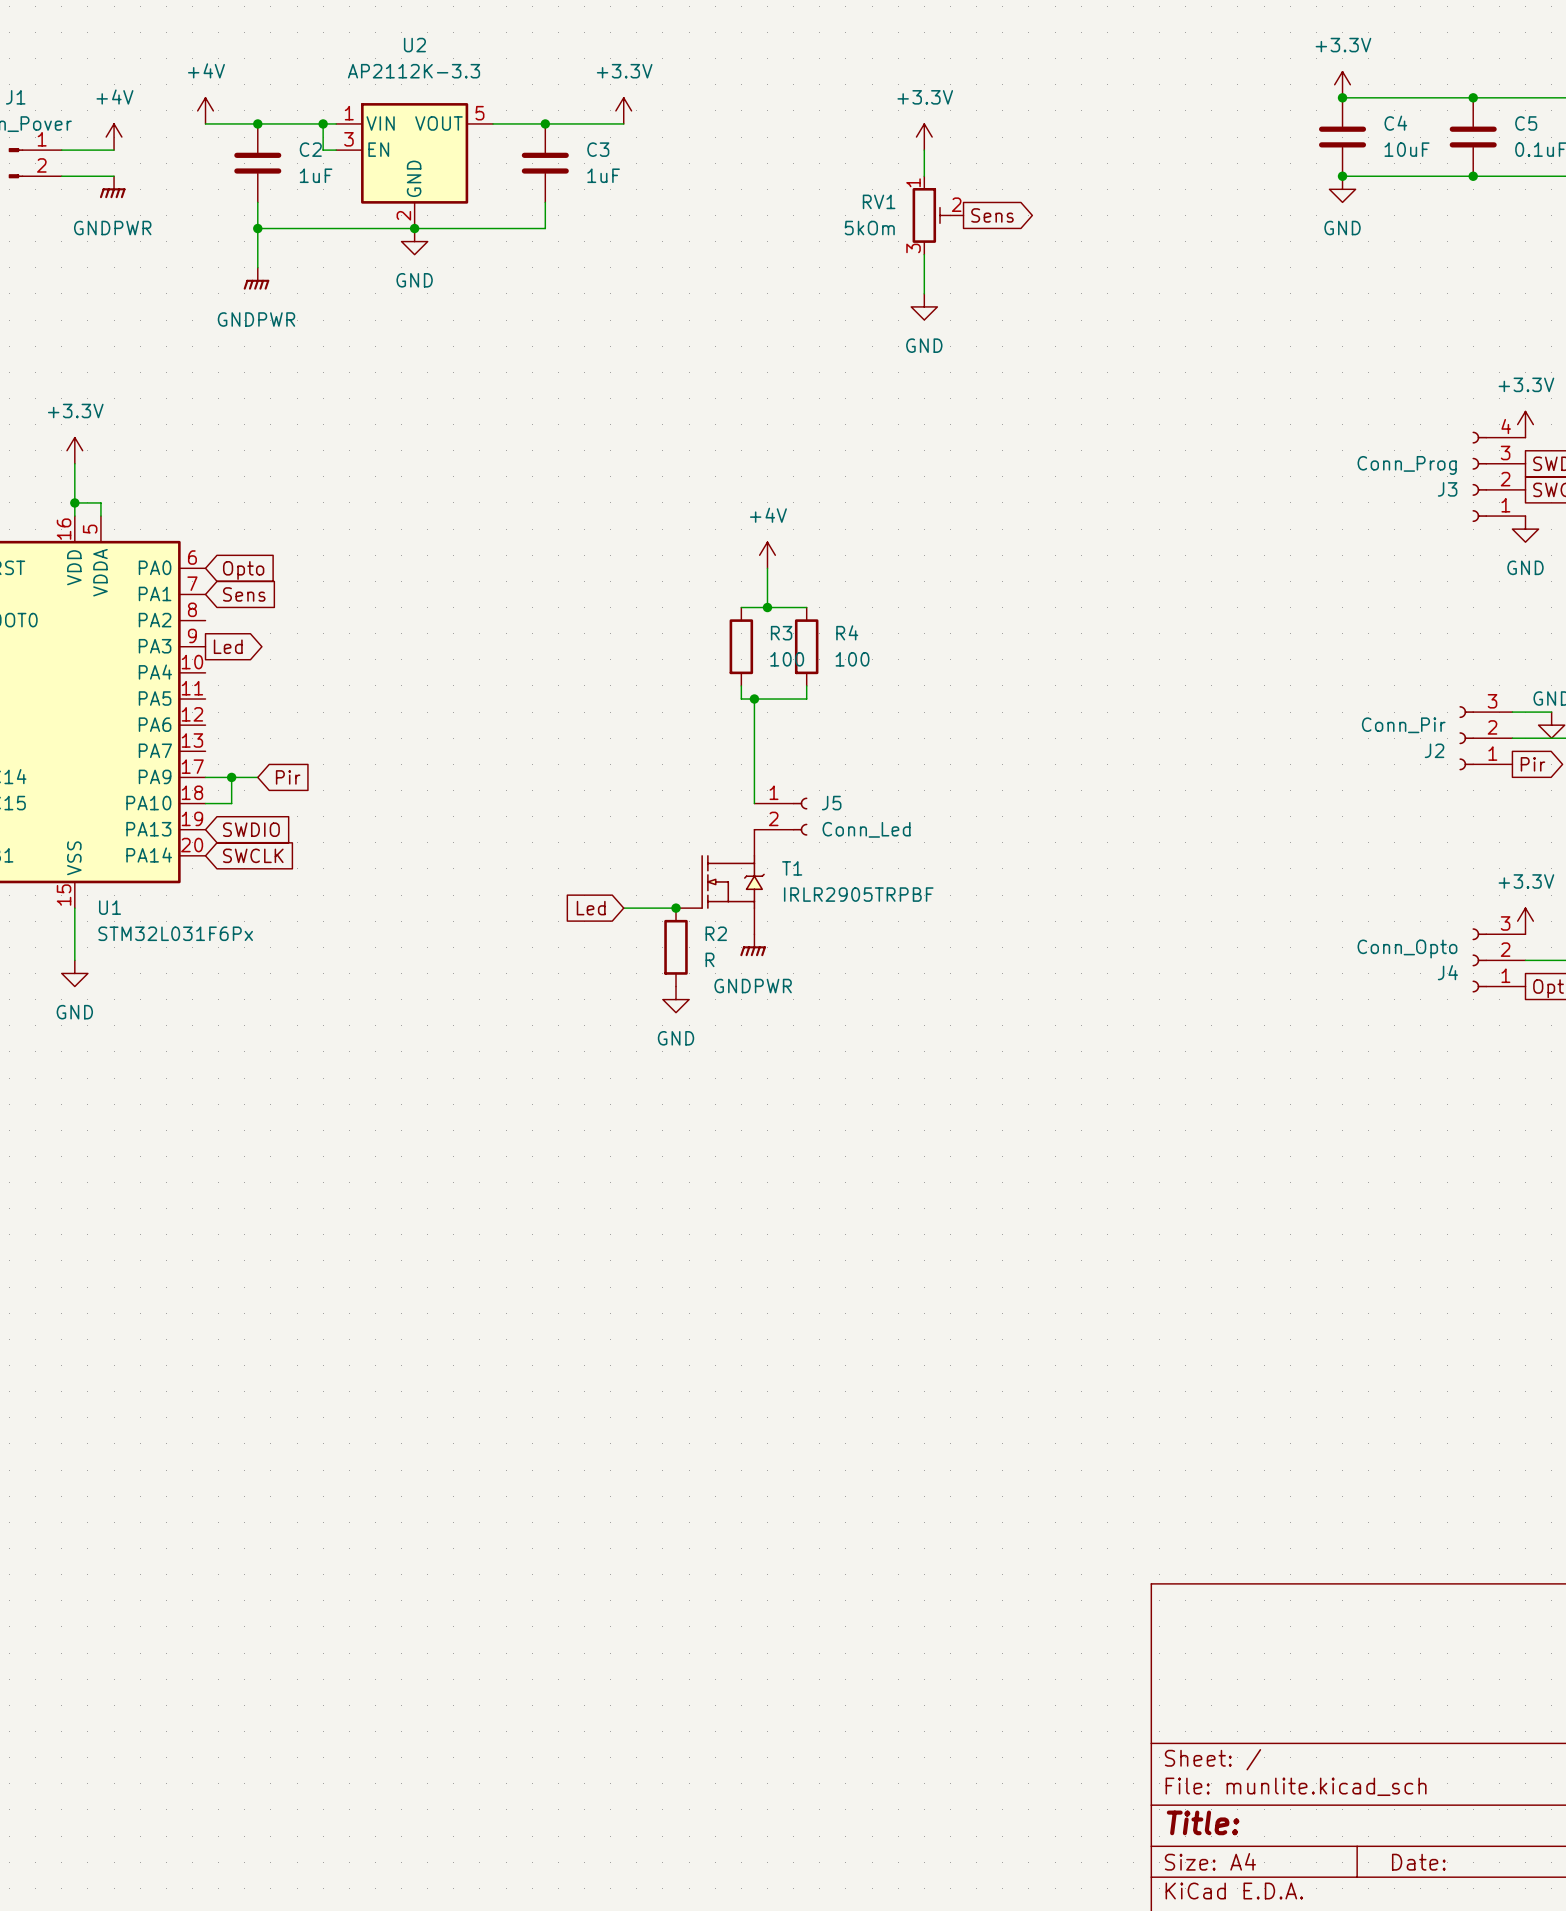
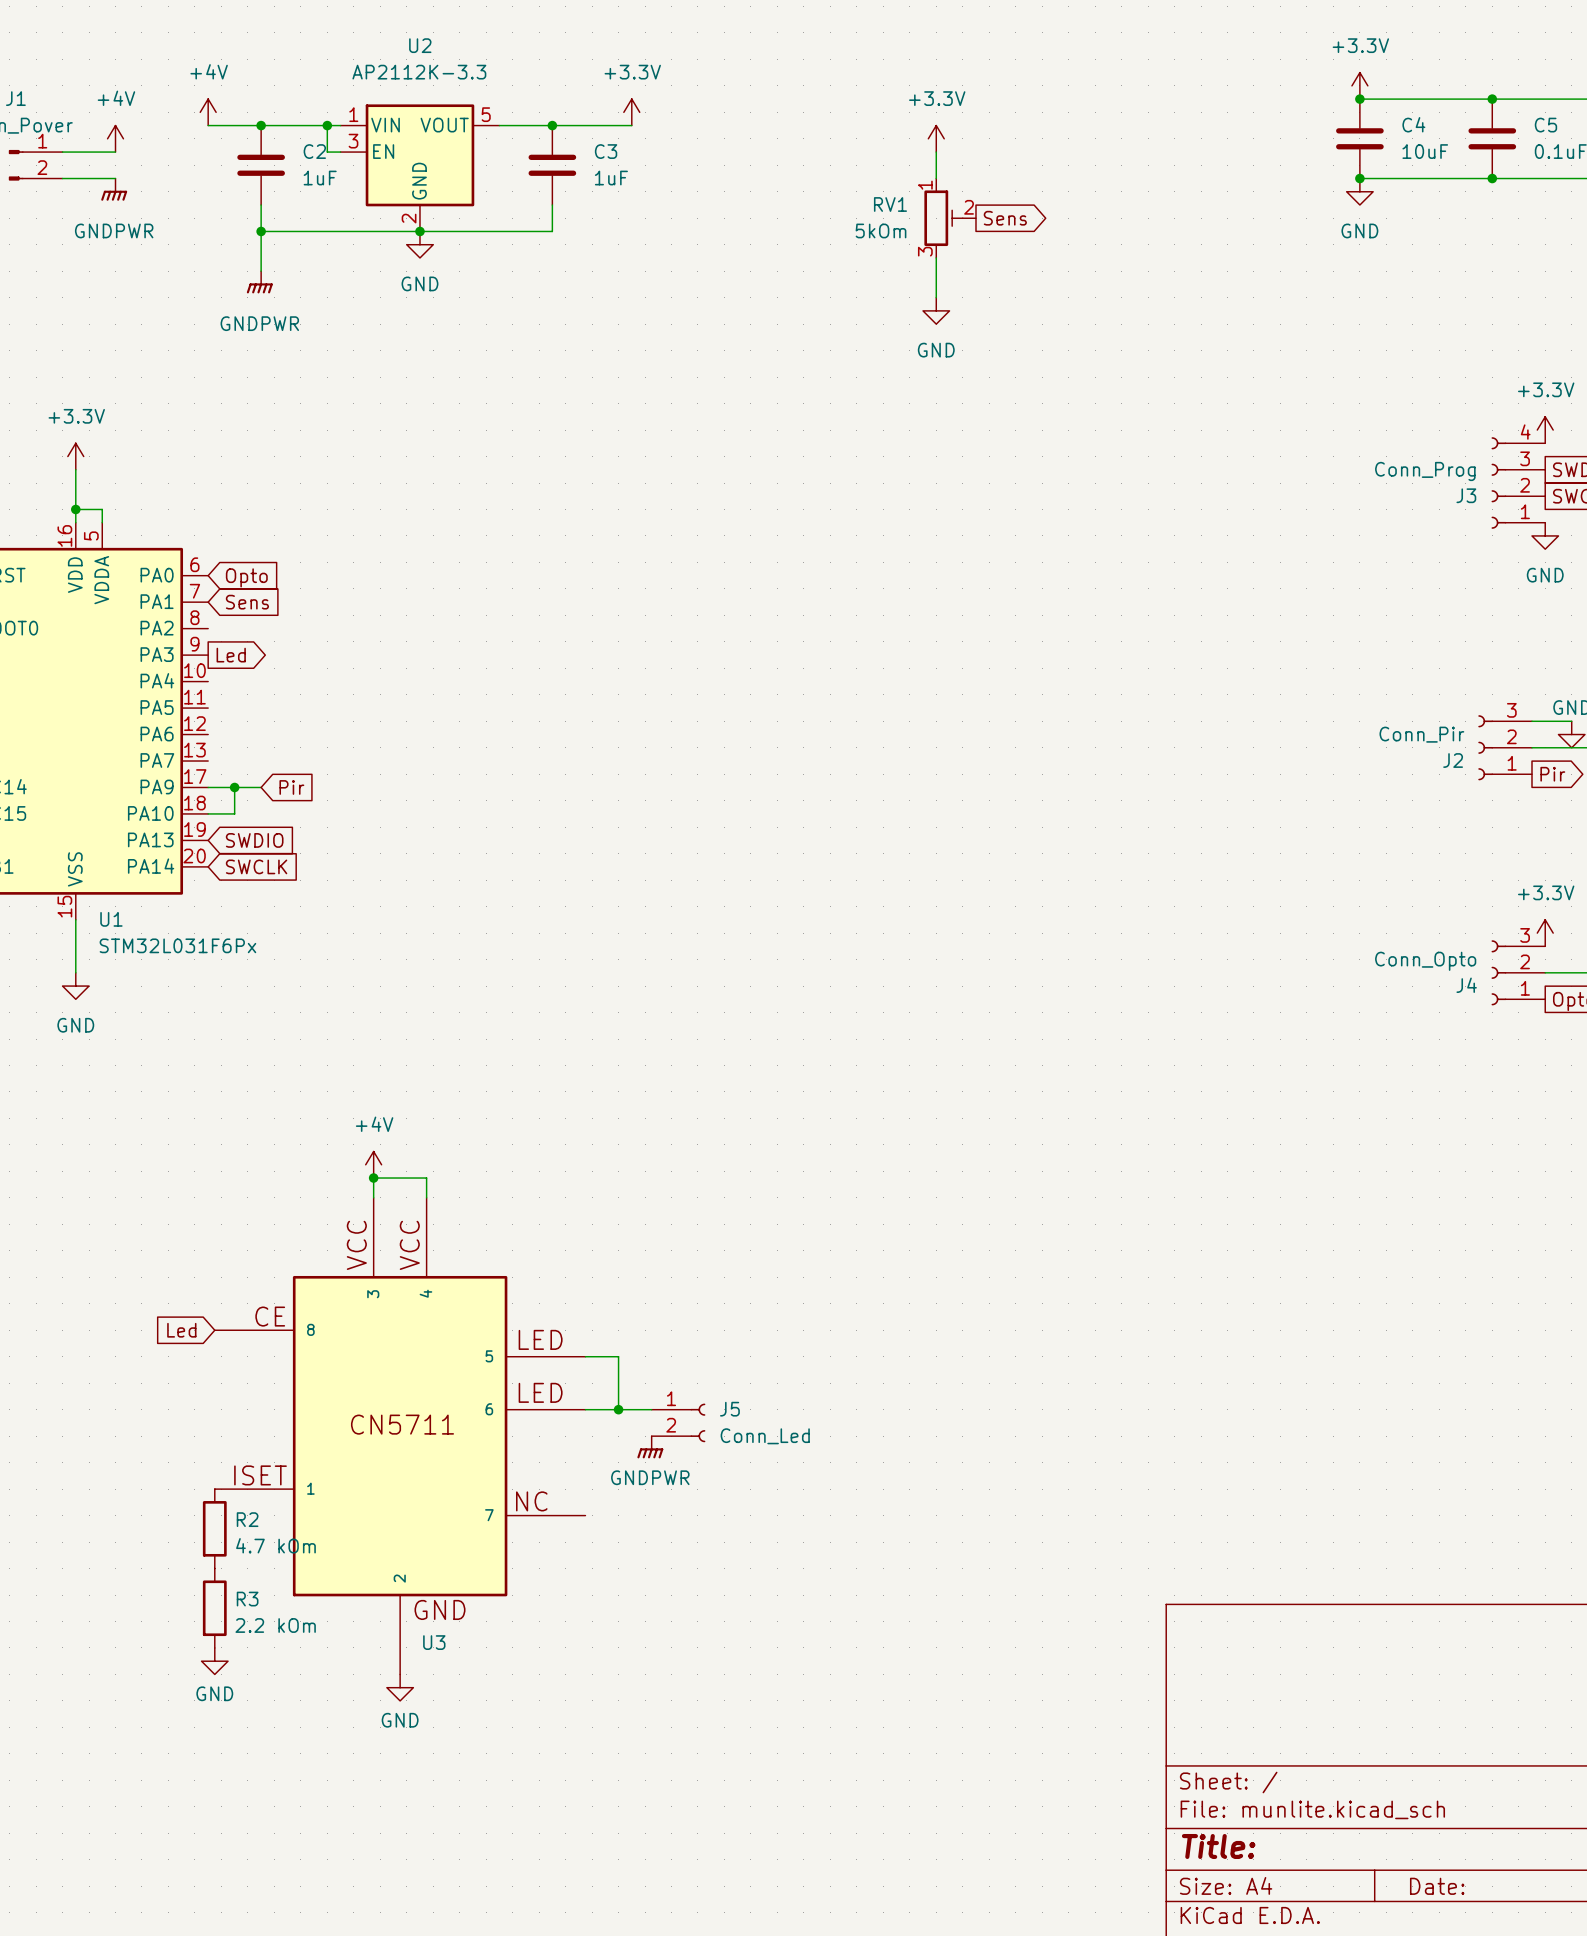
power symbol: +4V (767, 555) -> none
wire: (767, 568) (767, 607) -> none
wire: (741, 607) (806, 607) -> none
junction: (767, 607) -> none
R3 name position: R3 (781, 633) -> R3 (247, 1599)
R3 position: (741, 646) -> (214, 1608)
R4: 100 (806, 646) -> none
R3 value: 100 (787, 659) -> 2.2 kOm (275, 1625)
wire: (741, 685) (741, 699) (806, 699) (806, 685) -> none
wire: (754, 699) (754, 803) -> none
junction: (754, 699) -> none
J5 position: (780, 816) -> (678, 1422)
T1: IRLR2905TRPBF (720, 881) -> none
global label: Led (591, 908) -> none
wire: (623, 908) (676, 908) -> none
junction: (676, 908) -> none
R2 name position: R2 (716, 933) -> R2 (247, 1519)
power symbol: GNDPWR (753, 945) -> none
R2 position: (676, 947) -> (214, 1528)
R2 value: R (710, 959) -> 4.7 kOm (275, 1545)
power symbol: GND (676, 999) -> none
power symbol: none -> +4V (373, 1164)
junction: none -> (373, 1178)
wire: none -> (373, 1197) (373, 1178) (426, 1178) (426, 1197)
global label: none -> Led (181, 1330)
wire: none -> (585, 1356) (618, 1356) (618, 1409)
wire: none -> (585, 1409) (651, 1409)
junction: none -> (618, 1409)
U3: none -> (400, 1436)
power symbol: none -> GNDPWR (650, 1447)
power symbol: none -> GND (214, 1661)
power symbol: none -> GND (400, 1687)

